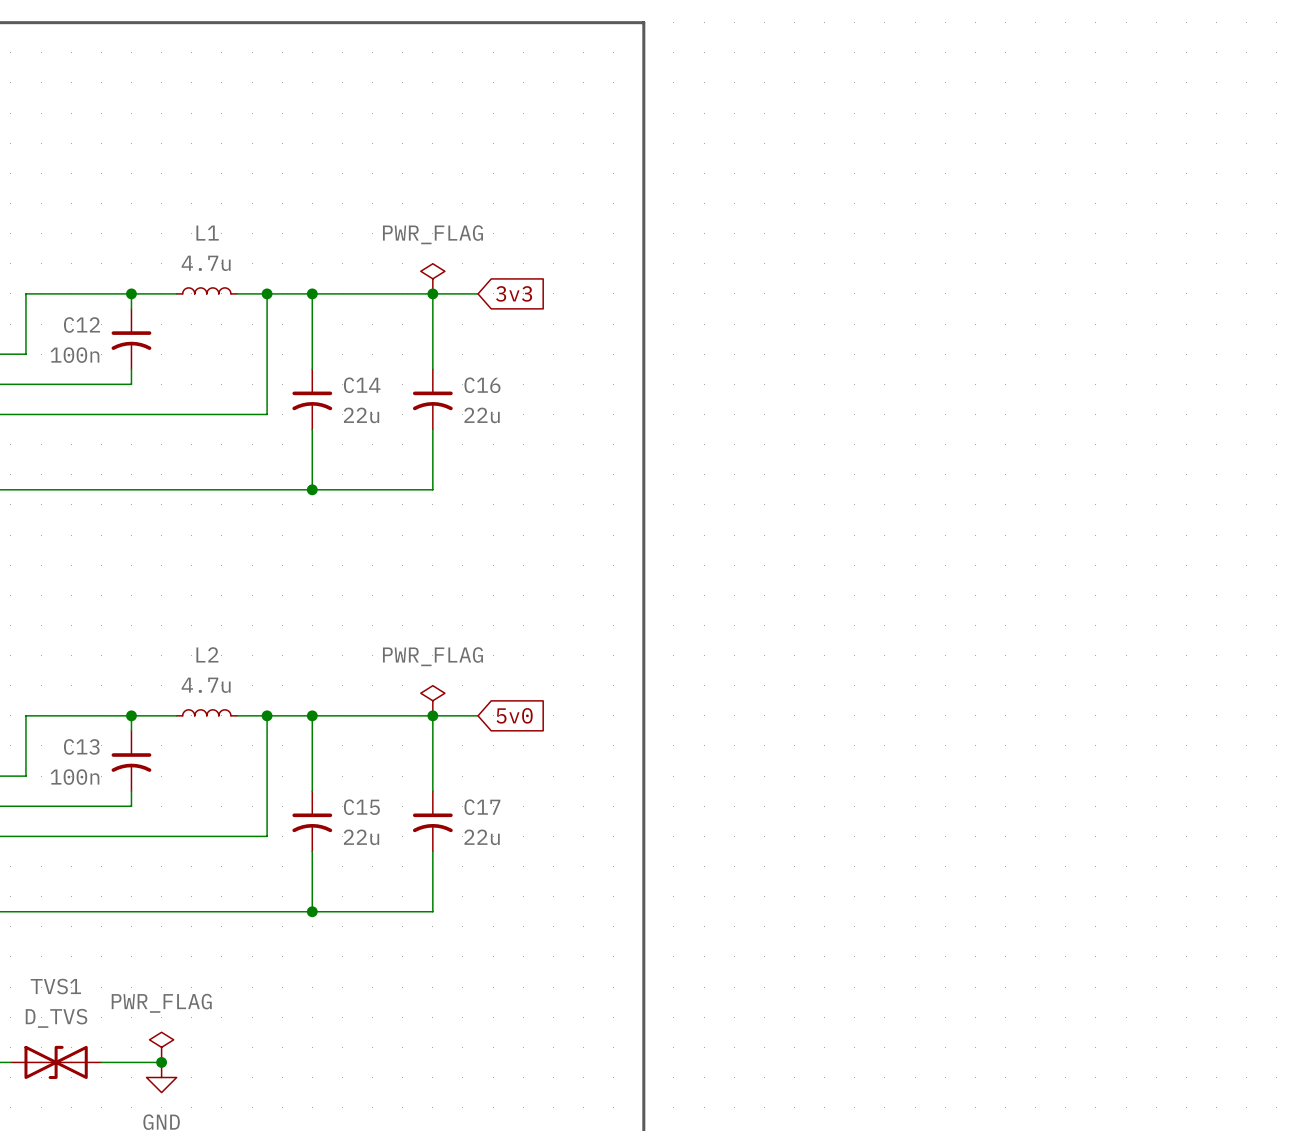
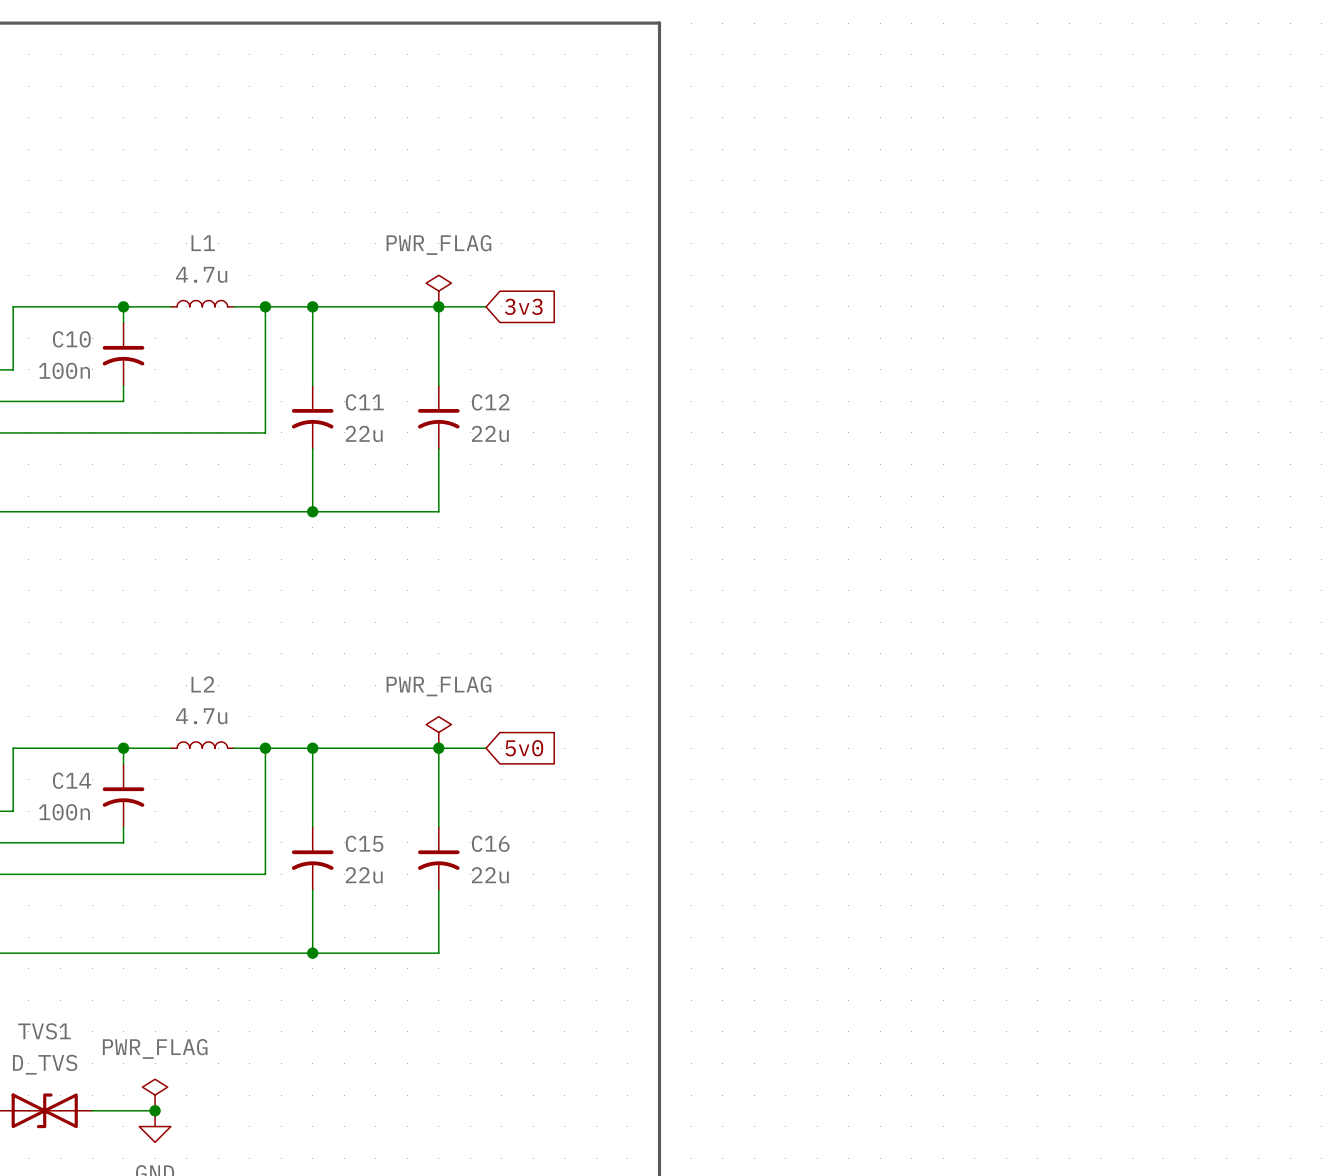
C12 name: C12 (81, 324) -> C10 (71, 339)
C14 name: C14 (362, 385) -> C11 (364, 402)
C16 name: C16 (482, 385) -> C12 (490, 402)
C13 name: C13 (81, 746) -> C14 (72, 780)
C17 name: C17 (482, 807) -> C16 (490, 843)

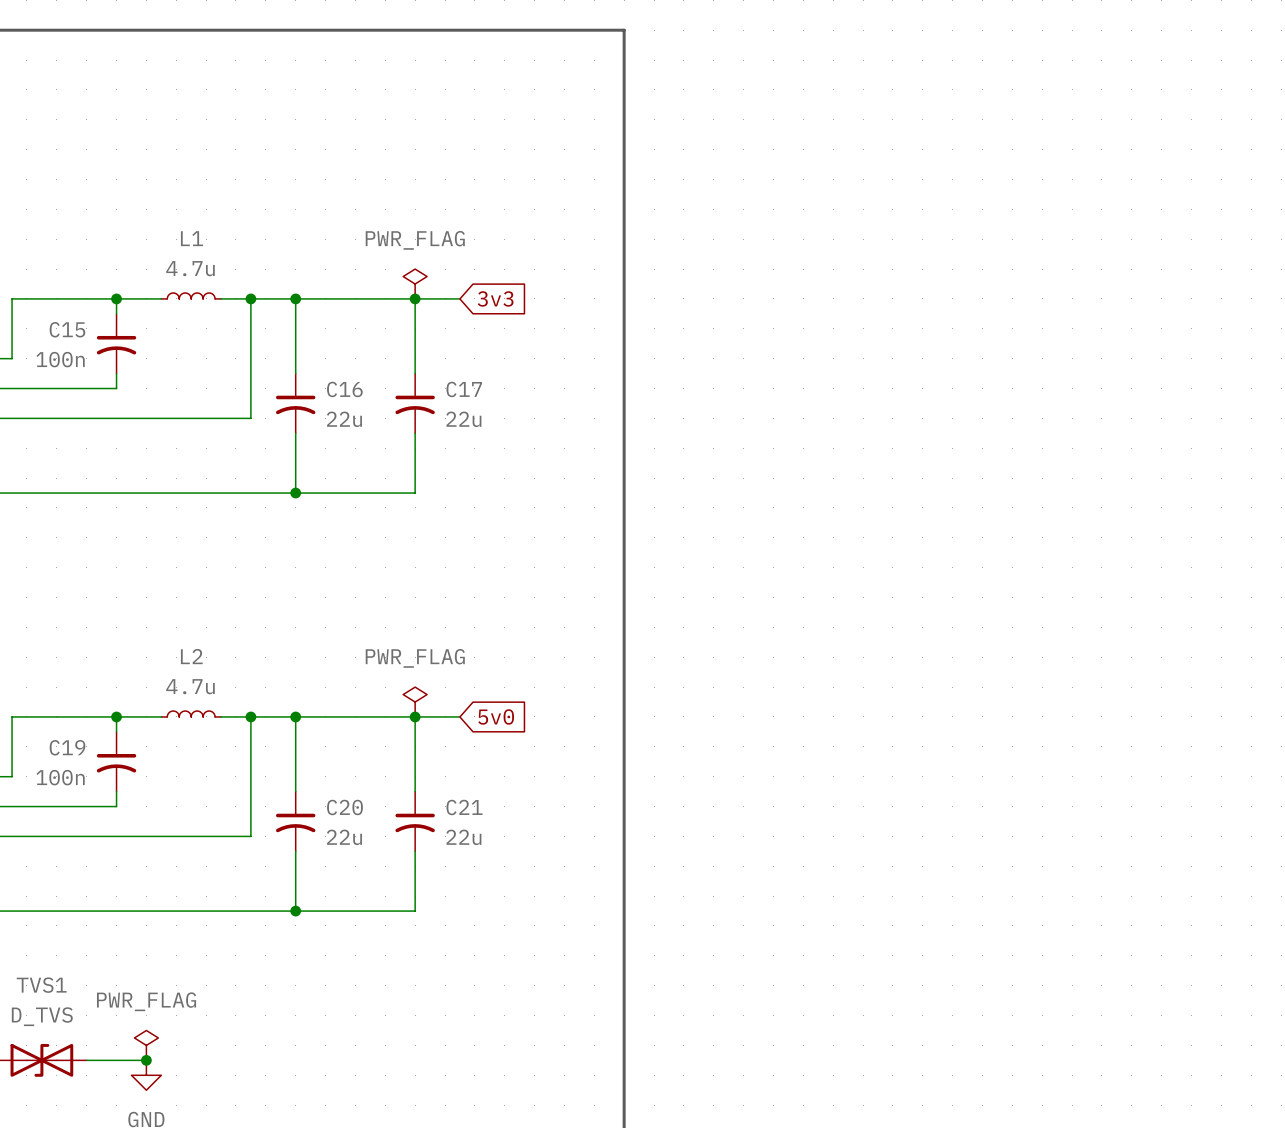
C10 name: C10 (71, 339) -> C15 (67, 329)
C11 name: C11 (364, 402) -> C16 (344, 389)
C12 name: C12 (490, 402) -> C17 (464, 389)
C14 name: C14 (72, 780) -> C19 (67, 747)
C15 name: C15 (364, 843) -> C20 (344, 807)
C16 name: C16 (490, 843) -> C21 (464, 807)

